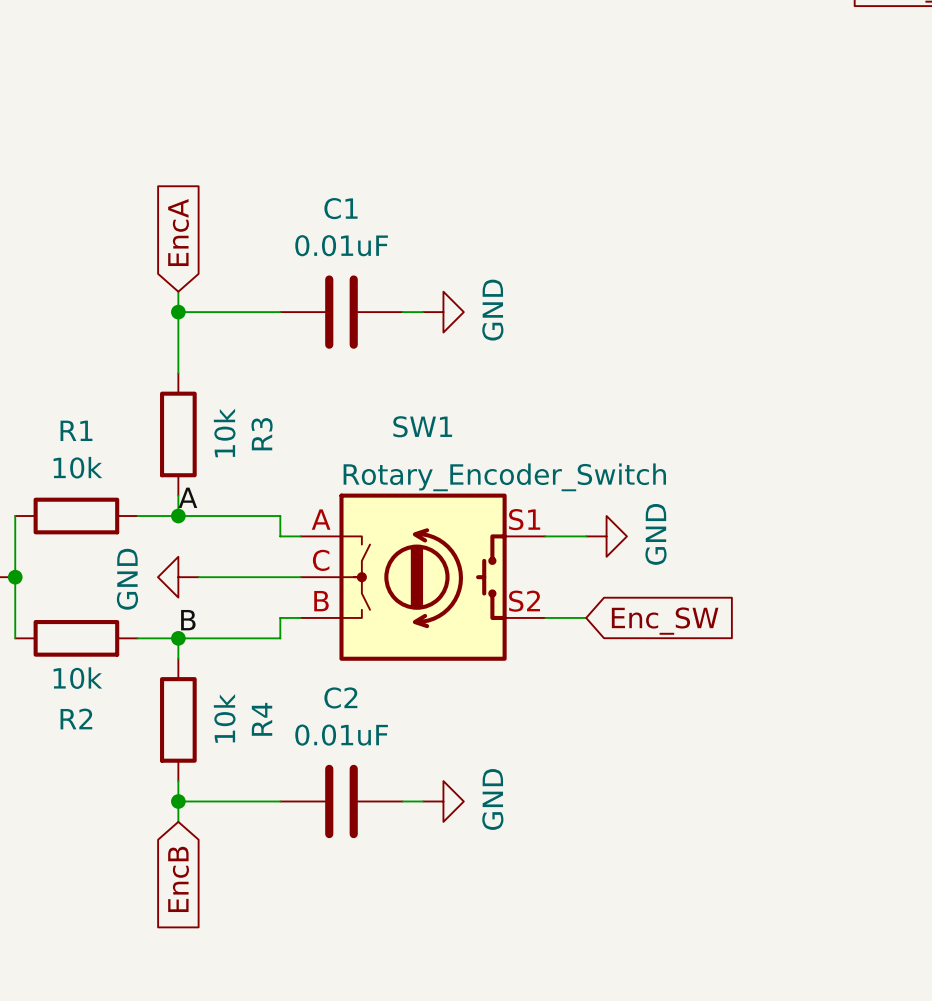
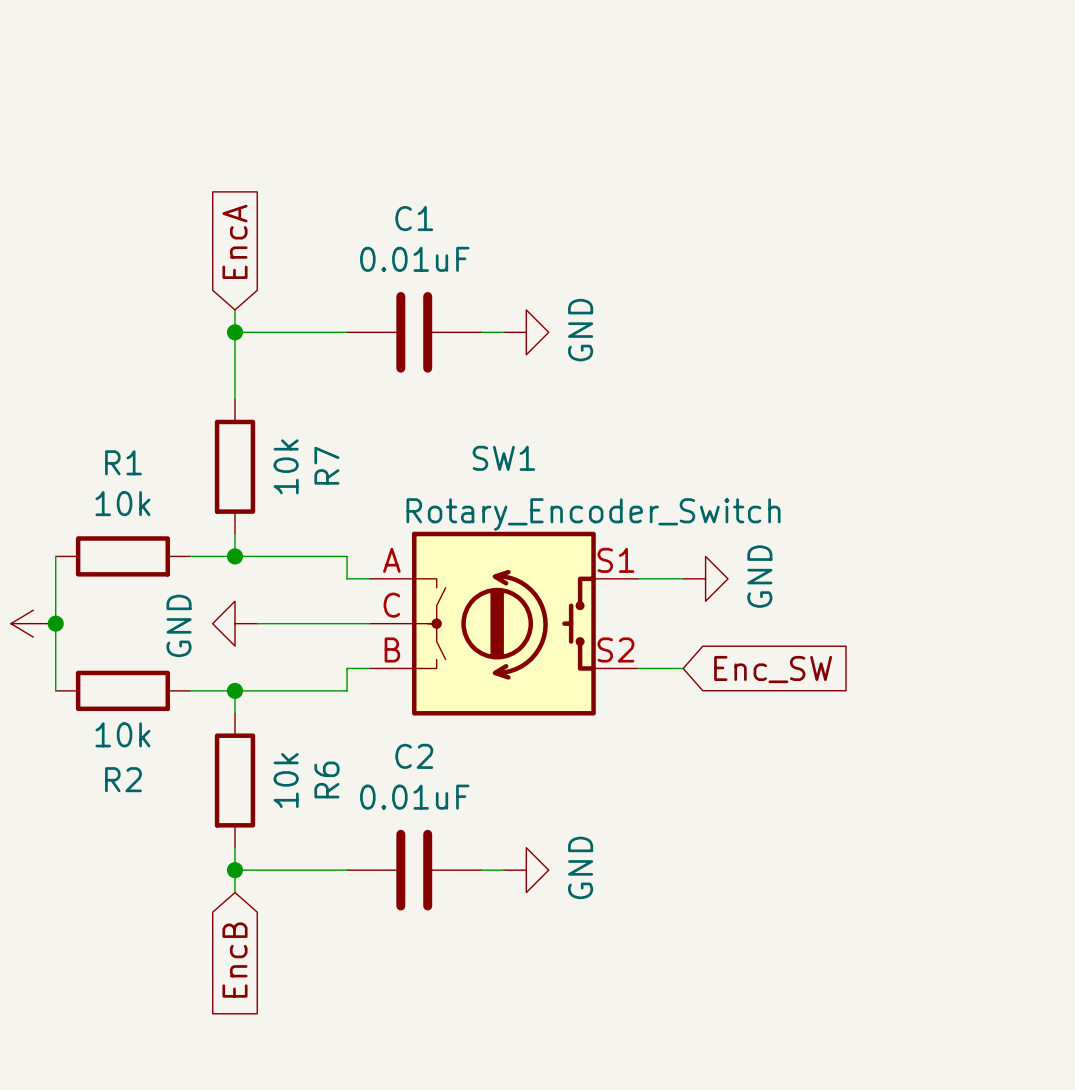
R3 name: R3 (262, 434) -> R7 (326, 465)
label: A (187, 497) -> none
label: B (188, 620) -> none
R4 name: R4 (262, 719) -> R6 (326, 779)

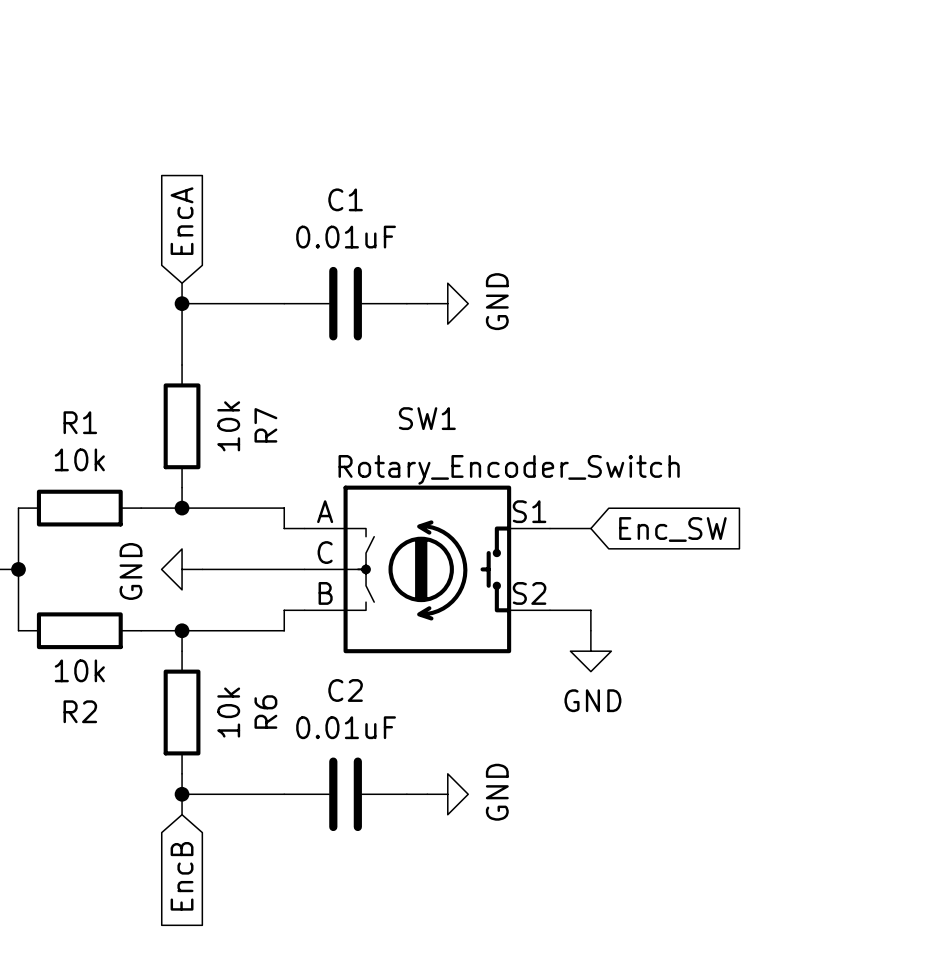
power symbol rotation: 0° (705, 578) -> 90° clockwise (590, 651)
power symbol position: GND (705, 578) -> GND (590, 651)
wire: none -> (590, 610) (590, 630)
global label position: Enc_SW (773, 669) -> Enc_SW (672, 529)

